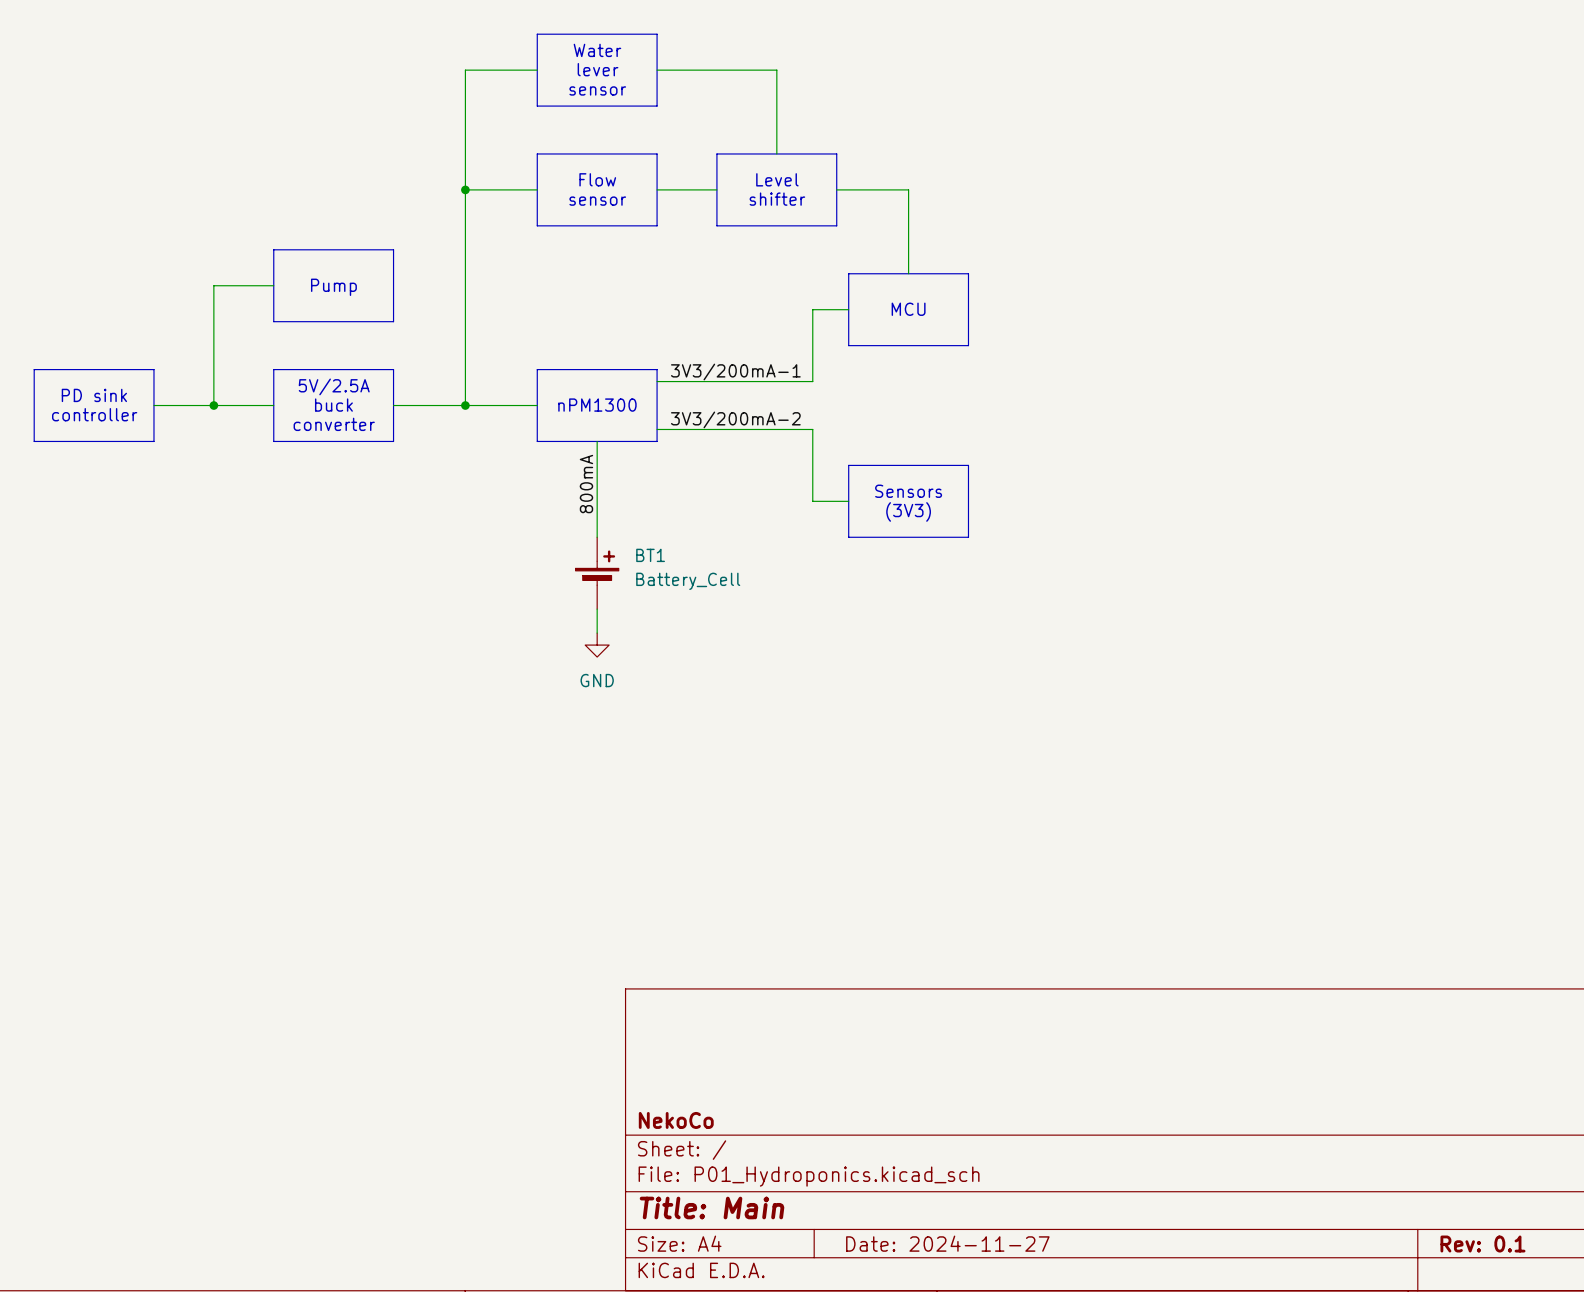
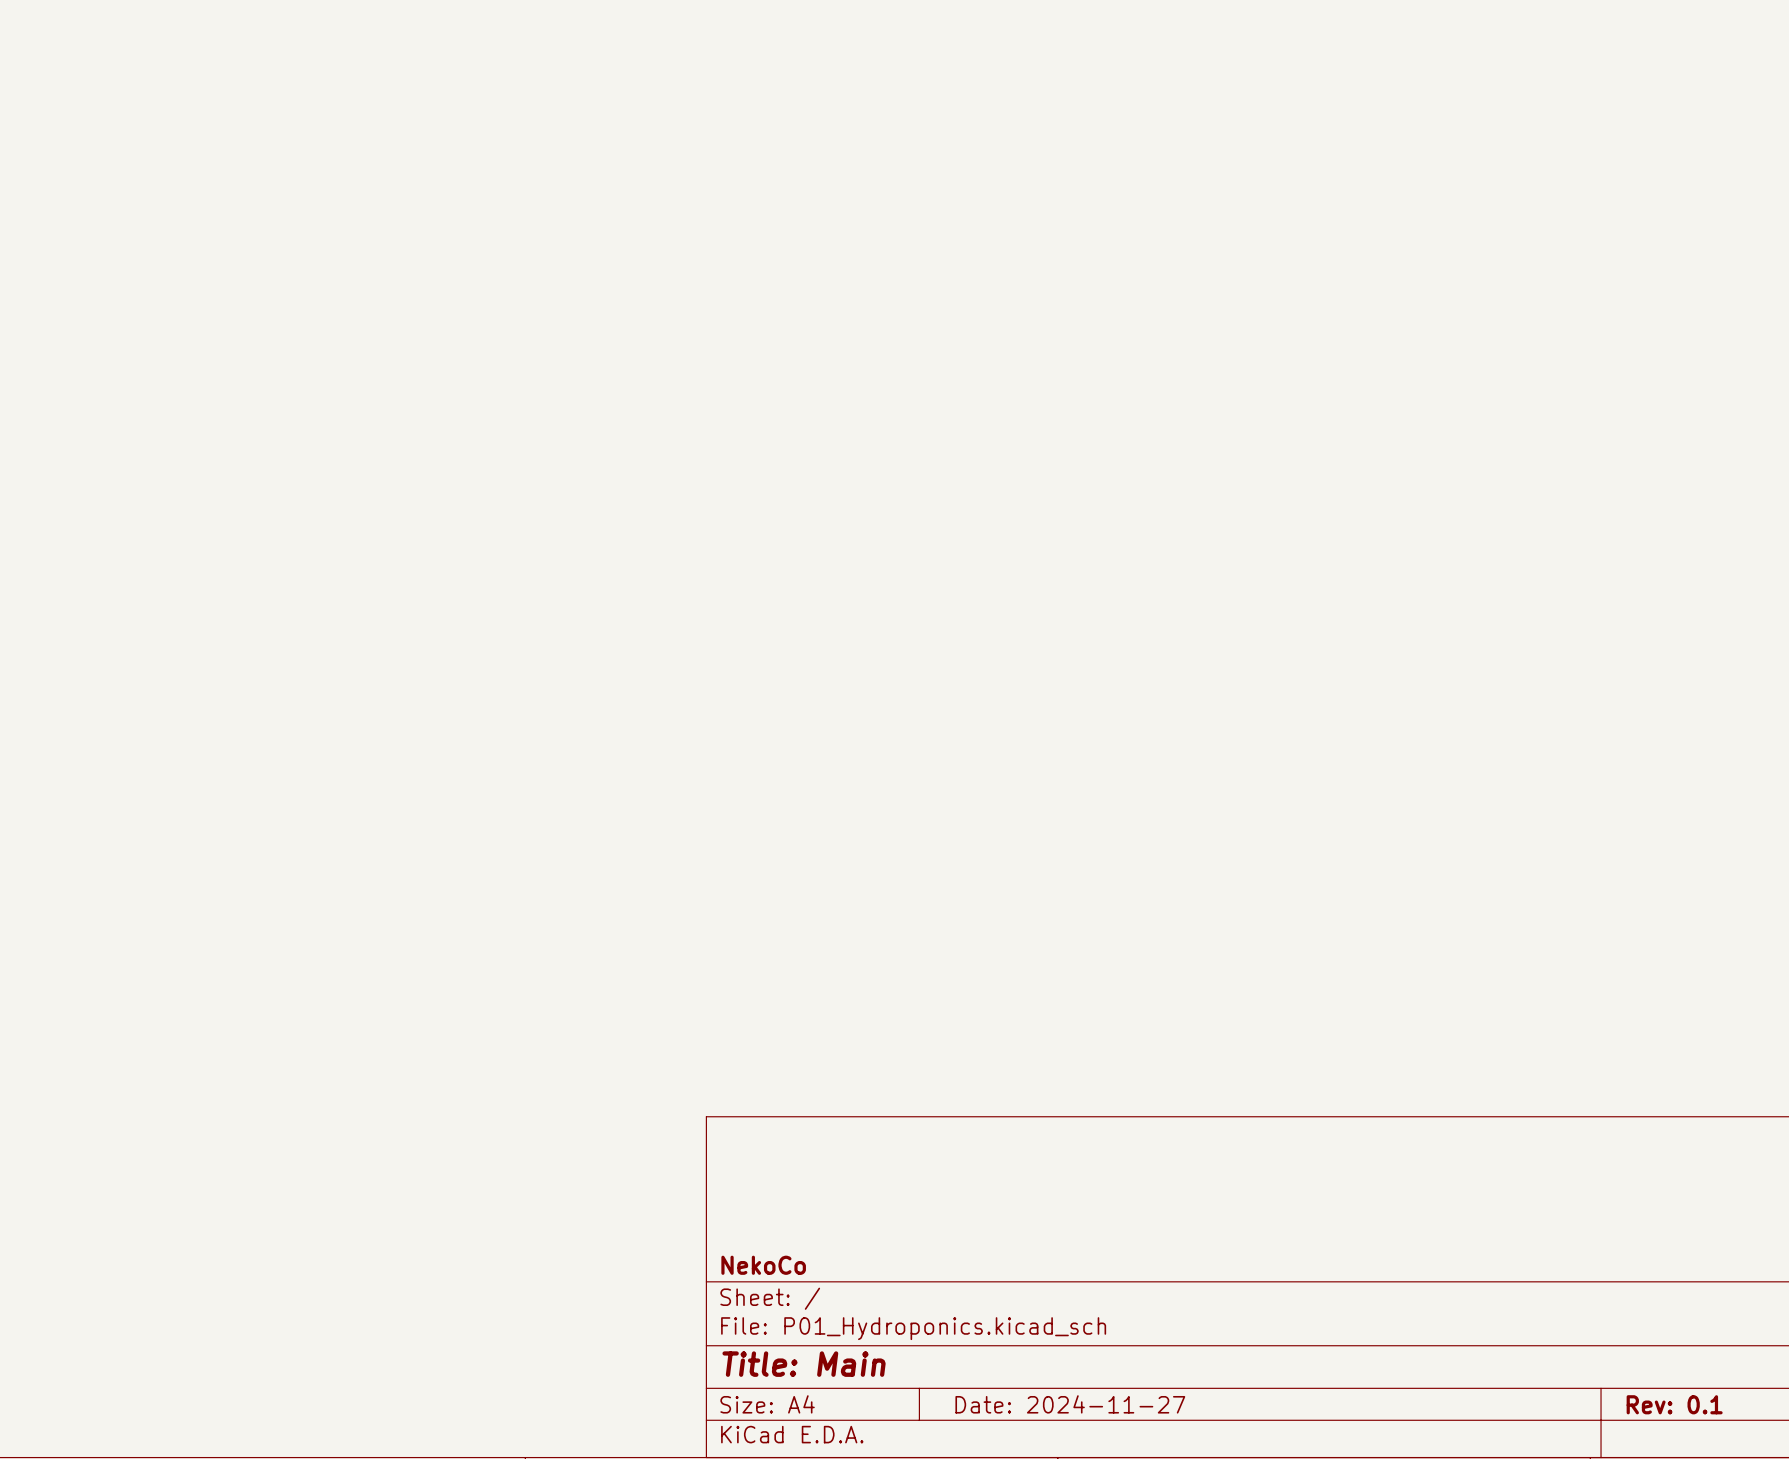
line: (537, 34) (657, 34) (657, 106) (537, 106) (537, 34) -> none
text: Water (597, 50) -> none
text: lever (598, 69) -> none
wire: (537, 70) (465, 70) (465, 405) -> none
wire: (657, 70) (776, 70) (776, 153) -> none
text: sensor (597, 90) -> none
line: (537, 153) (537, 225) (657, 225) (657, 153) (537, 153) -> none
line: (716, 153) (836, 153) (836, 225) (716, 225) (716, 153) -> none
text: Flow (597, 179) -> none
text: Level (777, 179) -> none
wire: (465, 189) (537, 189) -> none
junction: (465, 189) -> none
wire: (657, 189) (716, 189) -> none
wire: (836, 189) (908, 189) (908, 273) -> none
text: shifter (777, 199) -> none
text: sensor (597, 201) -> none
line: (273, 249) (393, 249) (393, 321) (273, 321) (273, 249) -> none
line: (848, 273) (968, 273) (968, 345) (848, 345) (848, 273) -> none
wire: (273, 285) (213, 285) (213, 405) -> none
text: Pump (333, 287) -> none
wire: (848, 309) (812, 309) (812, 381) (657, 381) -> none
text: MCU (908, 309) -> none
line: (34, 369) (153, 369) (153, 441) (34, 441) (34, 369) -> none
line: (273, 369) (273, 441) (393, 441) (393, 369) (273, 369) -> none
line: (537, 369) (657, 369) (657, 441) (537, 441) (537, 369) -> none
label: 3V3/200mA-1 (735, 372) -> none
text: 5V/2.5A (334, 386) -> none
text: PD sink (94, 395) -> none
wire: (153, 405) (273, 405) -> none
junction: (213, 405) -> none
text: buck (333, 405) -> none
wire: (393, 405) (537, 405) -> none
junction: (465, 405) -> none
text: nPM1300 (597, 405) -> none
text: controller (94, 414) -> none
label: 3V3/200mA-2 (735, 419) -> none
text: converter (334, 424) -> none
wire: (657, 429) (812, 429) (812, 501) (848, 501) -> none
wire: (597, 441) (597, 537) -> none
line: (848, 465) (848, 537) (968, 537) (968, 465) (848, 465) -> none
label: 800mA (586, 484) -> none
text: Sensors (908, 491) -> none
text: (3V3) (908, 511) -> none
BT1: Battery_Cell (597, 573) -> none
wire: (597, 609) (597, 633) -> none
power symbol: GND (597, 645) -> none

